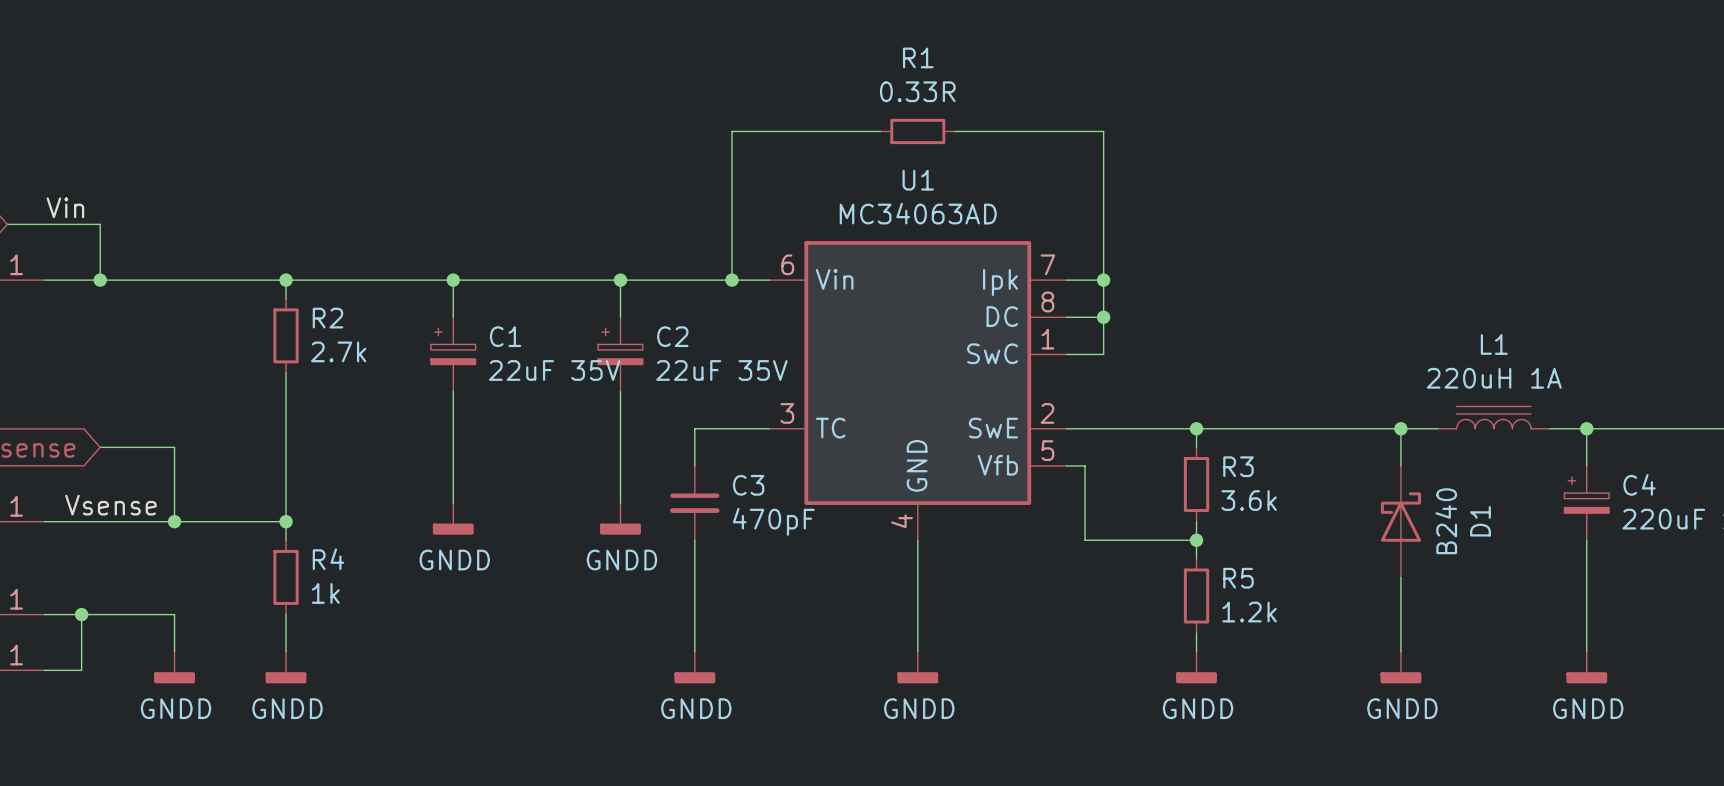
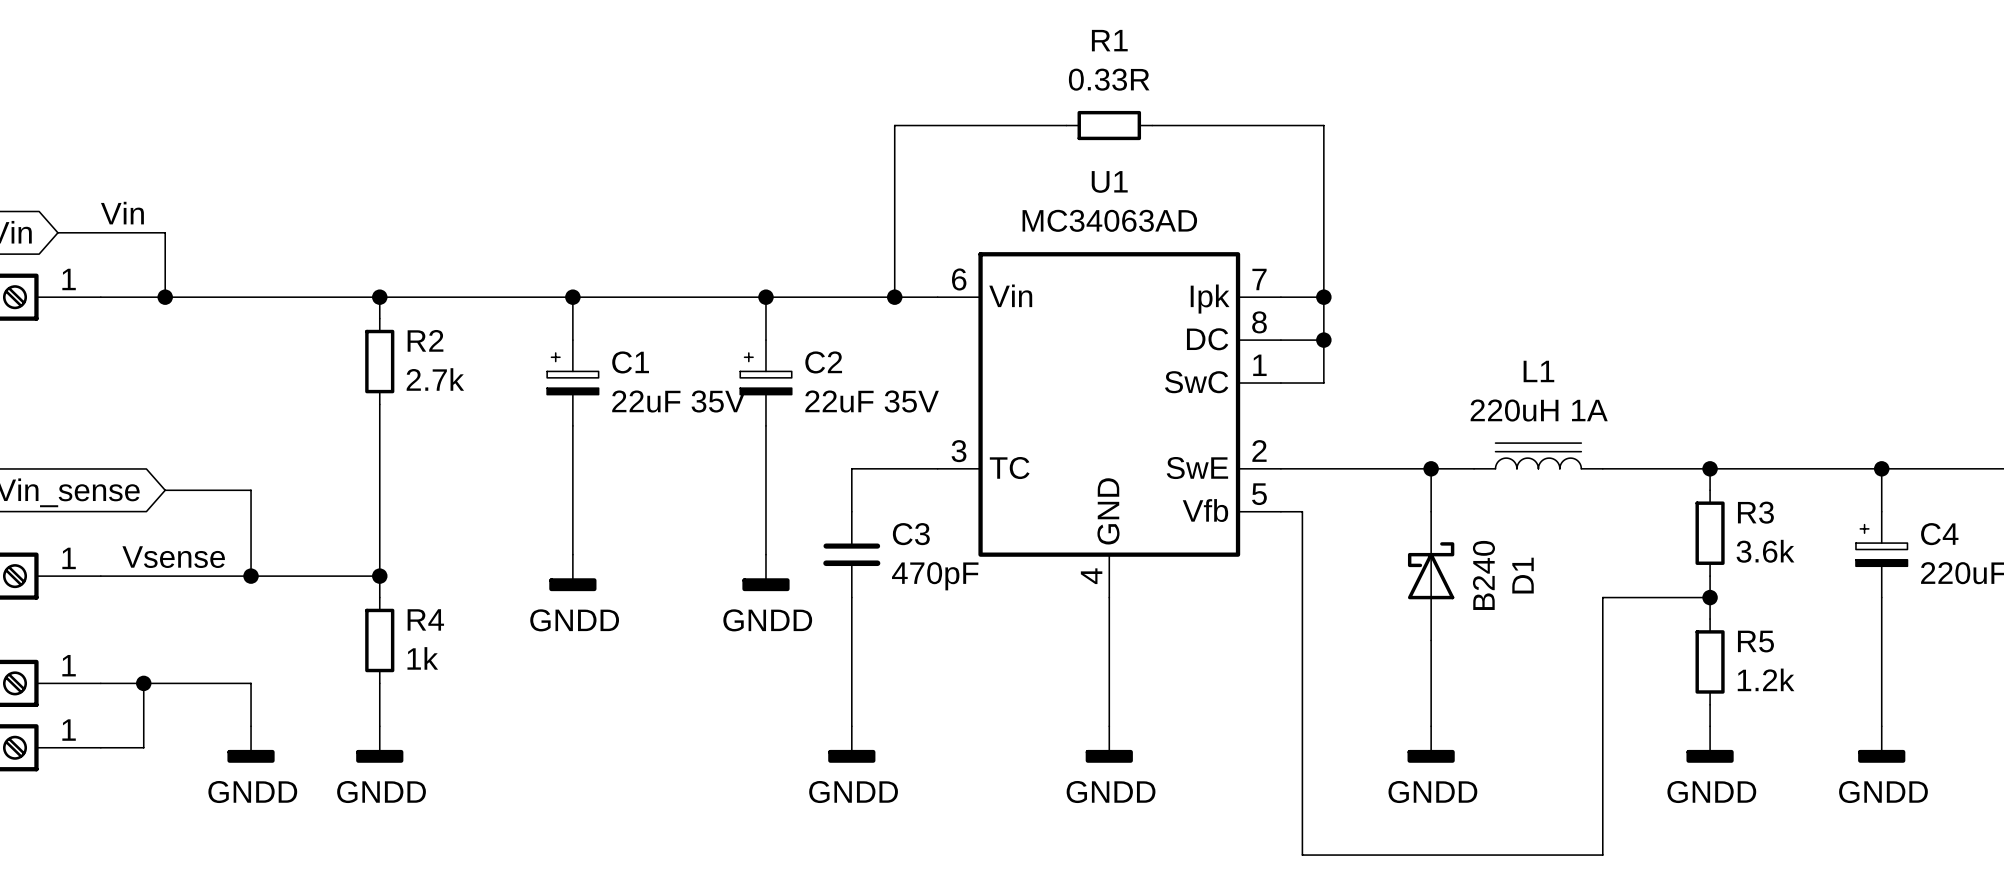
L1 position: (1493, 417) -> (1538, 455)
wire: (1233, 428) (1345, 428) -> none
wire: (1400, 428) (1400, 465) -> (1710, 576) (1710, 619)
junction position: (1400, 428) -> (1710, 468)
wire: none -> (1838, 468) (1710, 468) (1710, 490)
R3 position: (1196, 484) -> (1710, 533)
D1 position: (1400, 521) -> (1431, 576)
wire: (1085, 540) (1196, 540) -> (1302, 597) (1302, 855) (1602, 855) (1602, 597) (1710, 597)
junction: (1196, 540) -> none
junction: none -> (1710, 597)
wire: none -> (1431, 640) (1431, 704)
wire: (1400, 577) (1400, 651) -> none
R5 position: (1196, 596) -> (1710, 661)
wire: none -> (1710, 704) (1710, 726)
power symbol position: GNDD (1400, 667) -> GNDD (1710, 744)

